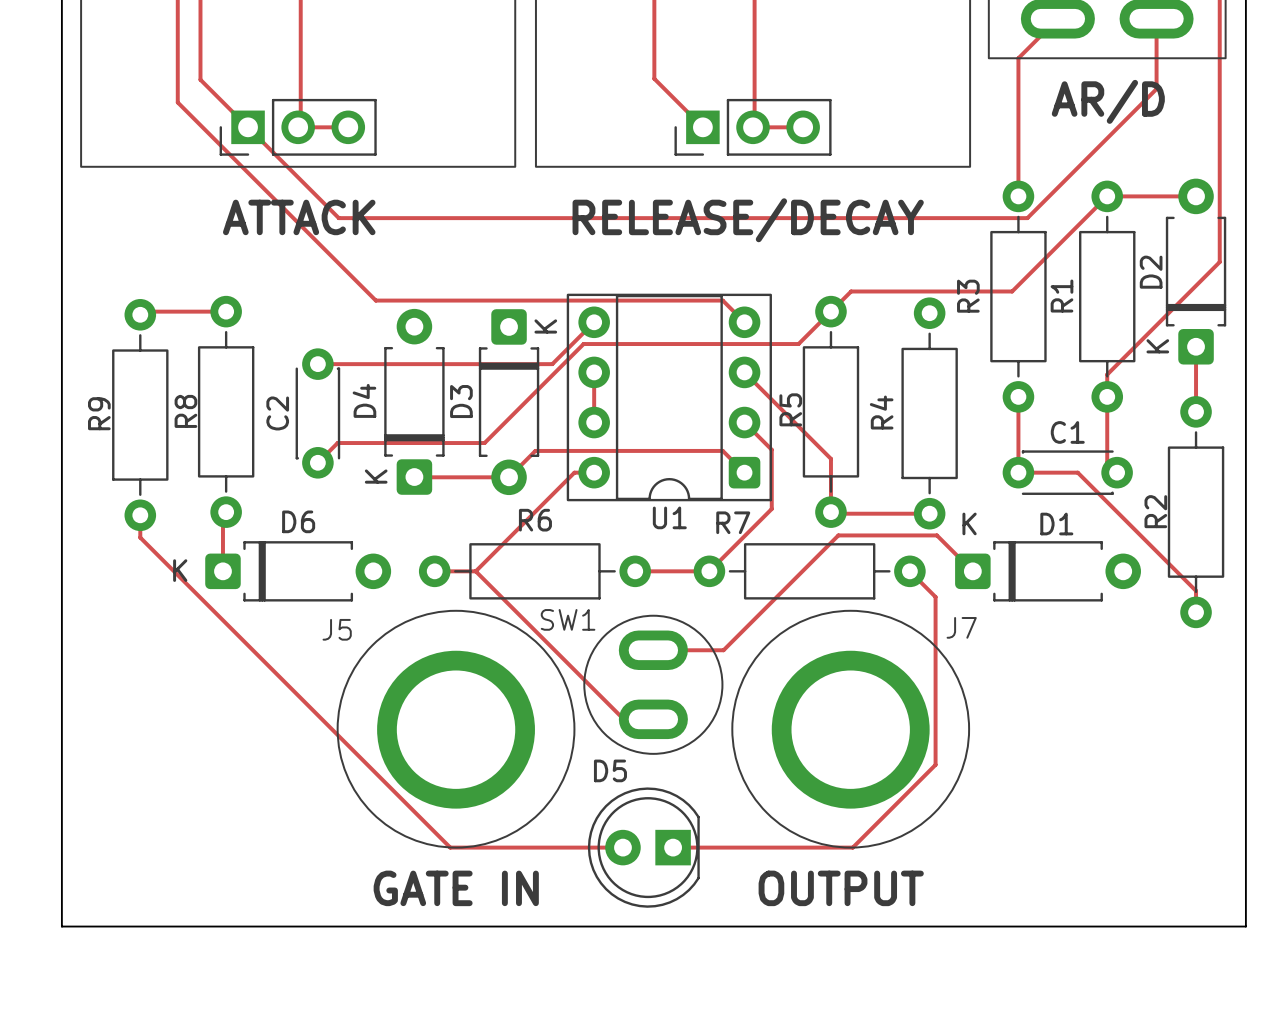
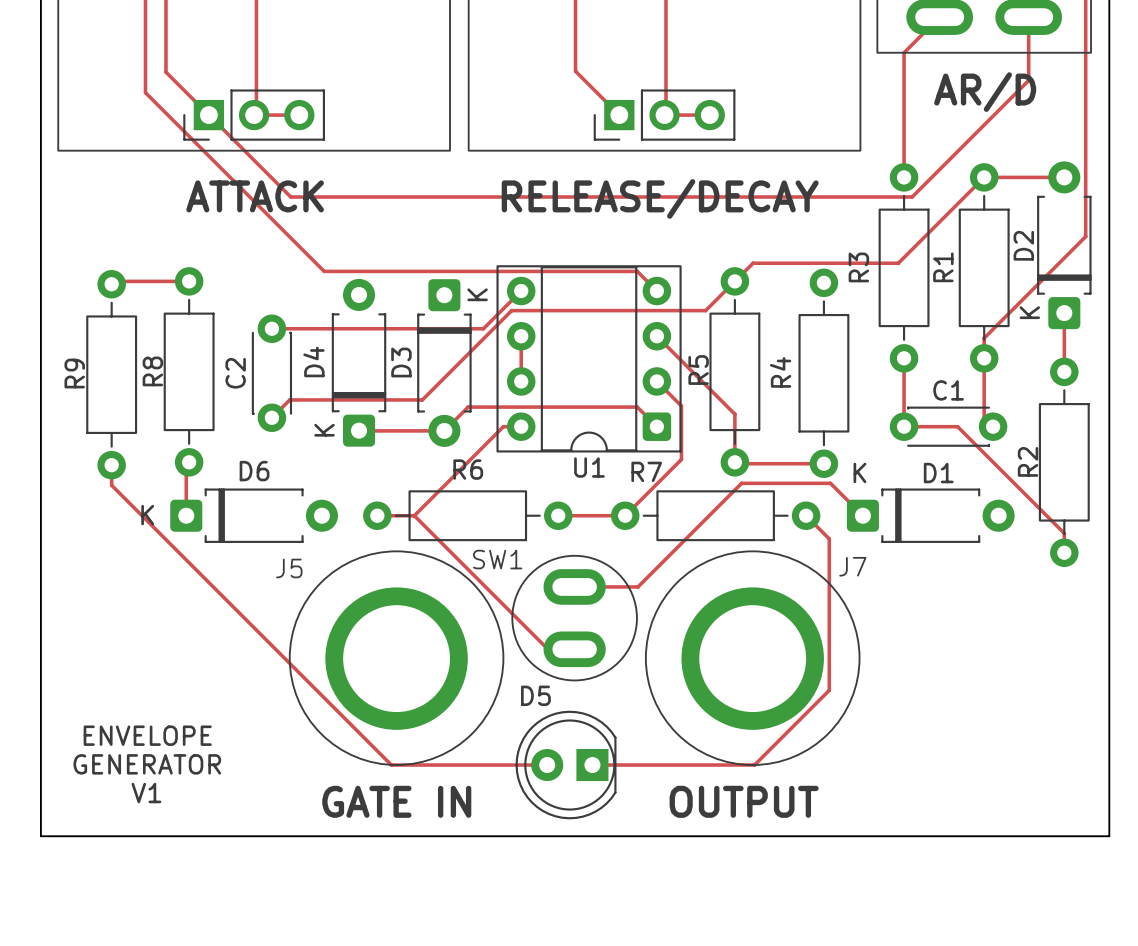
text: none -> ENVELOPE (147, 735)
text: none -> GENERATOR (147, 764)
text: none -> V1 (146, 793)

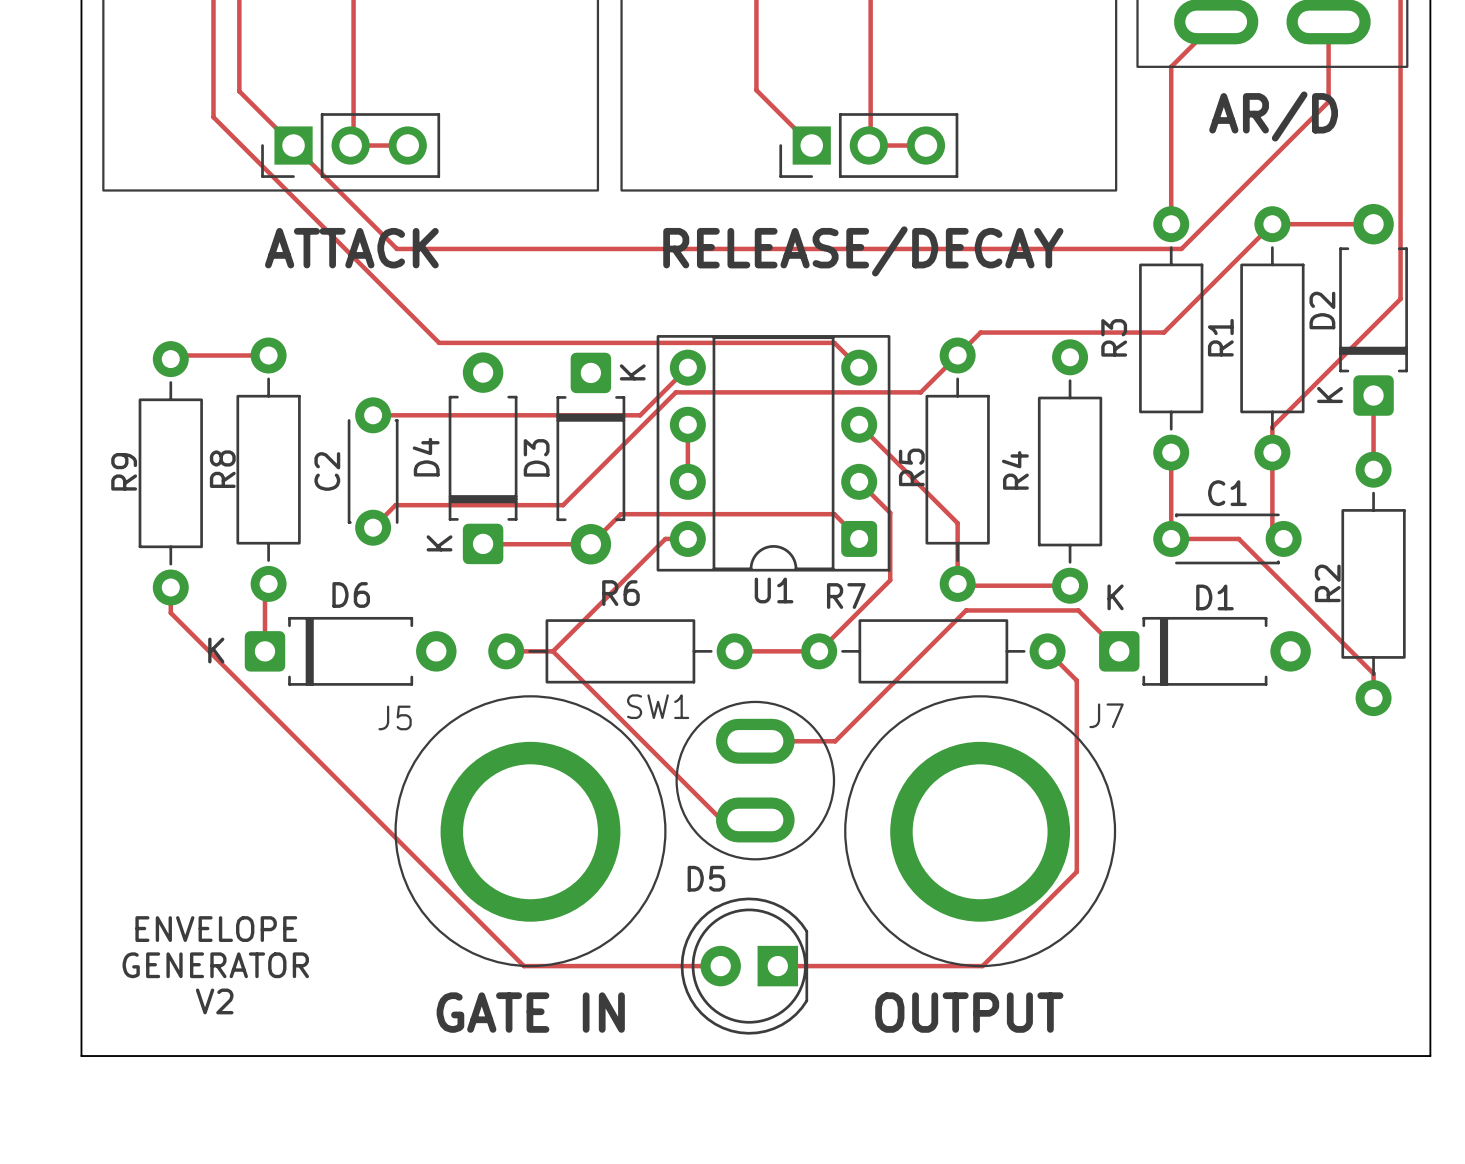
text: V1 (146, 793) -> V2 (214, 1001)

